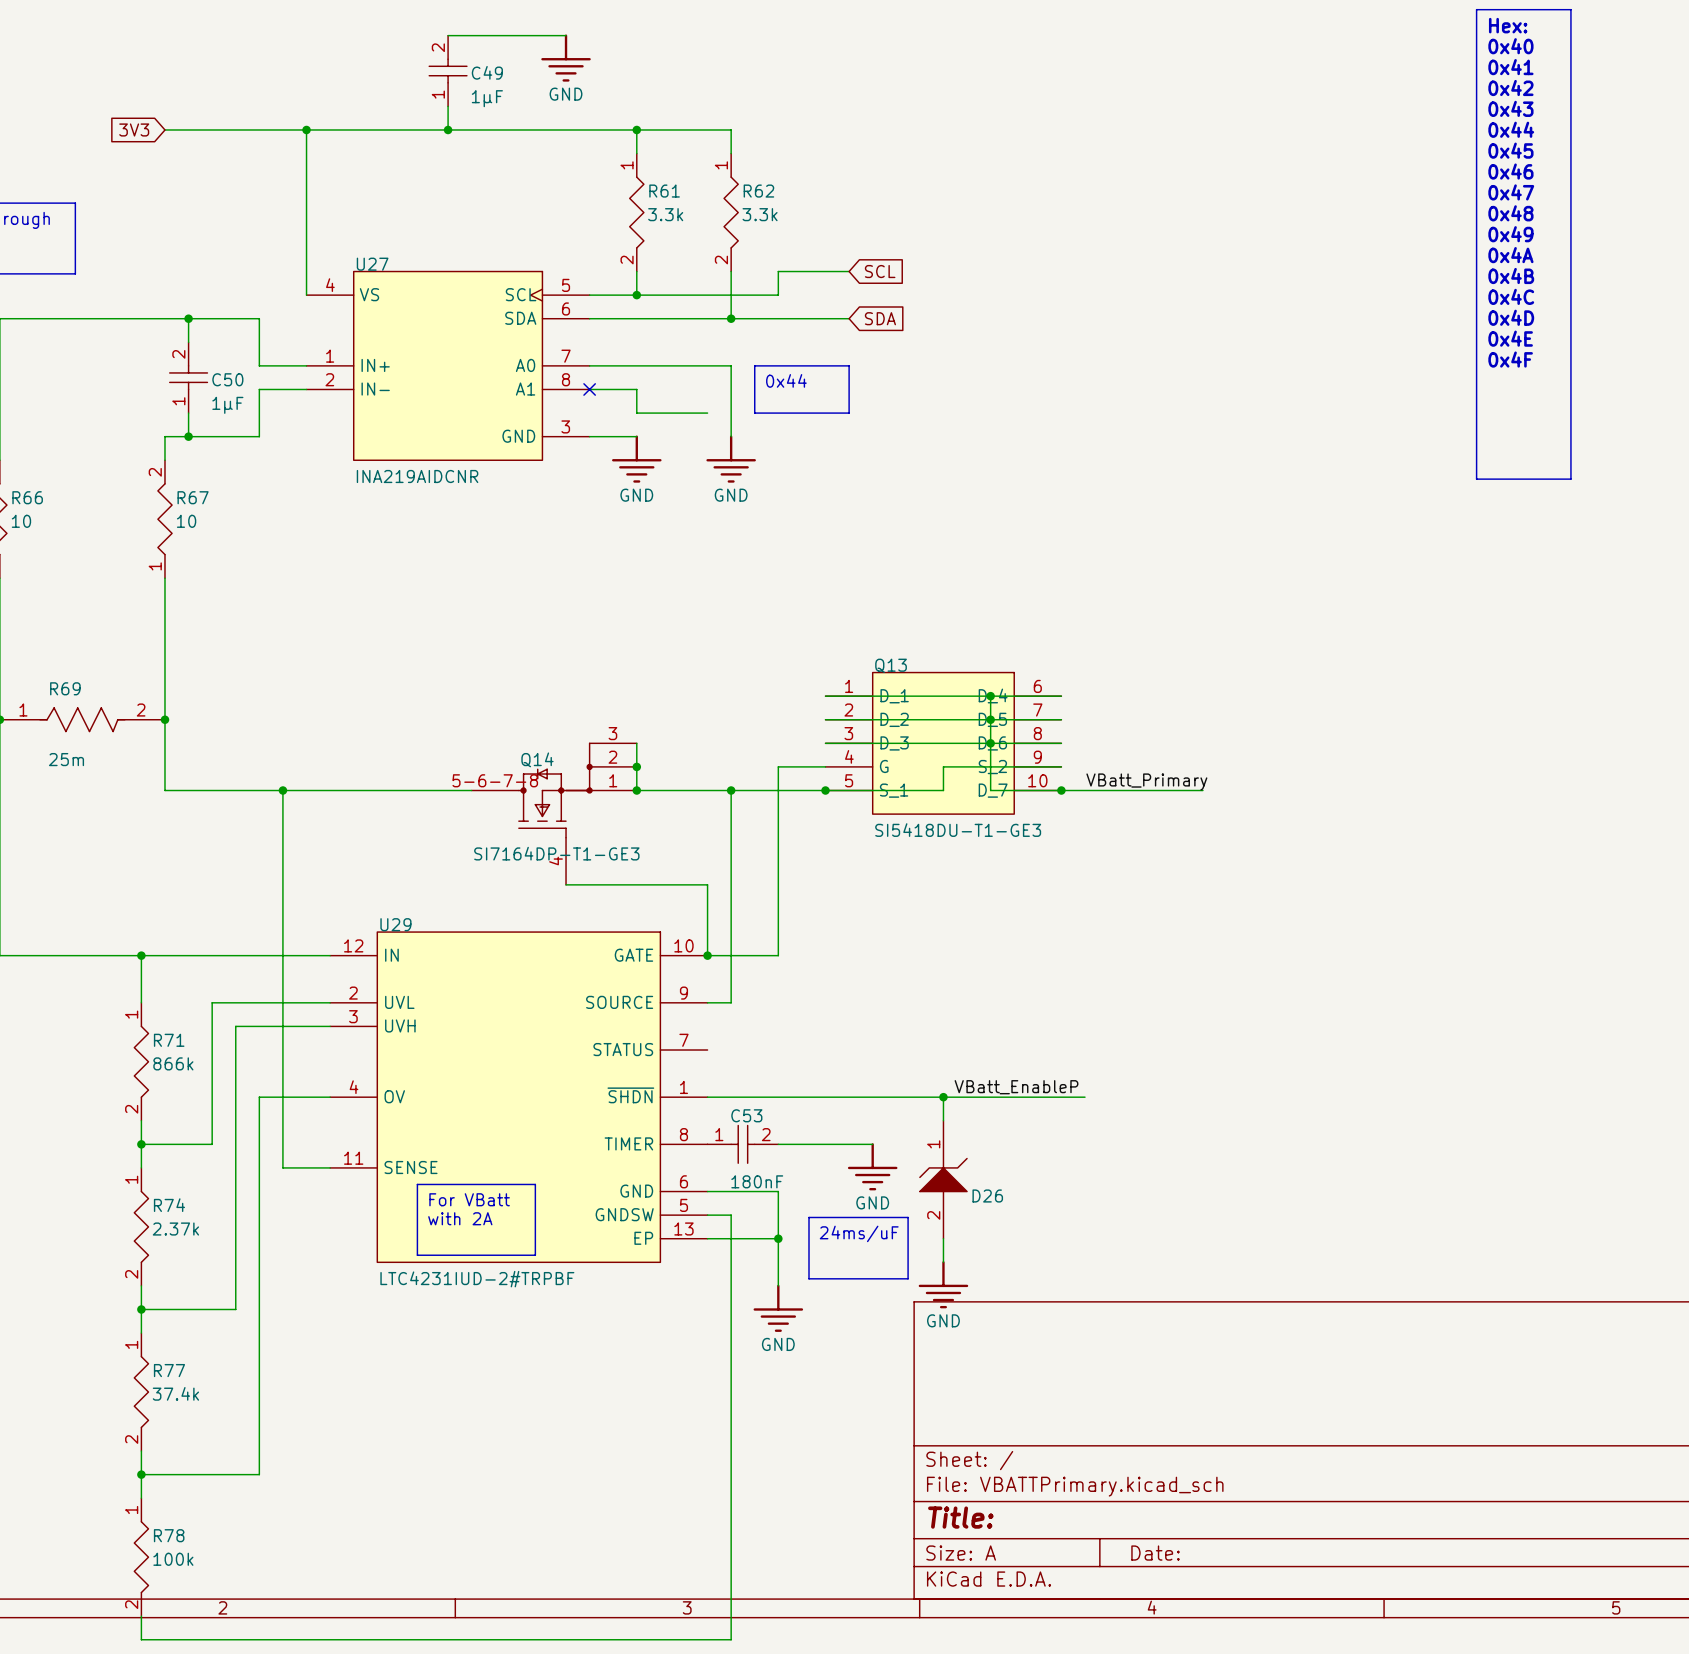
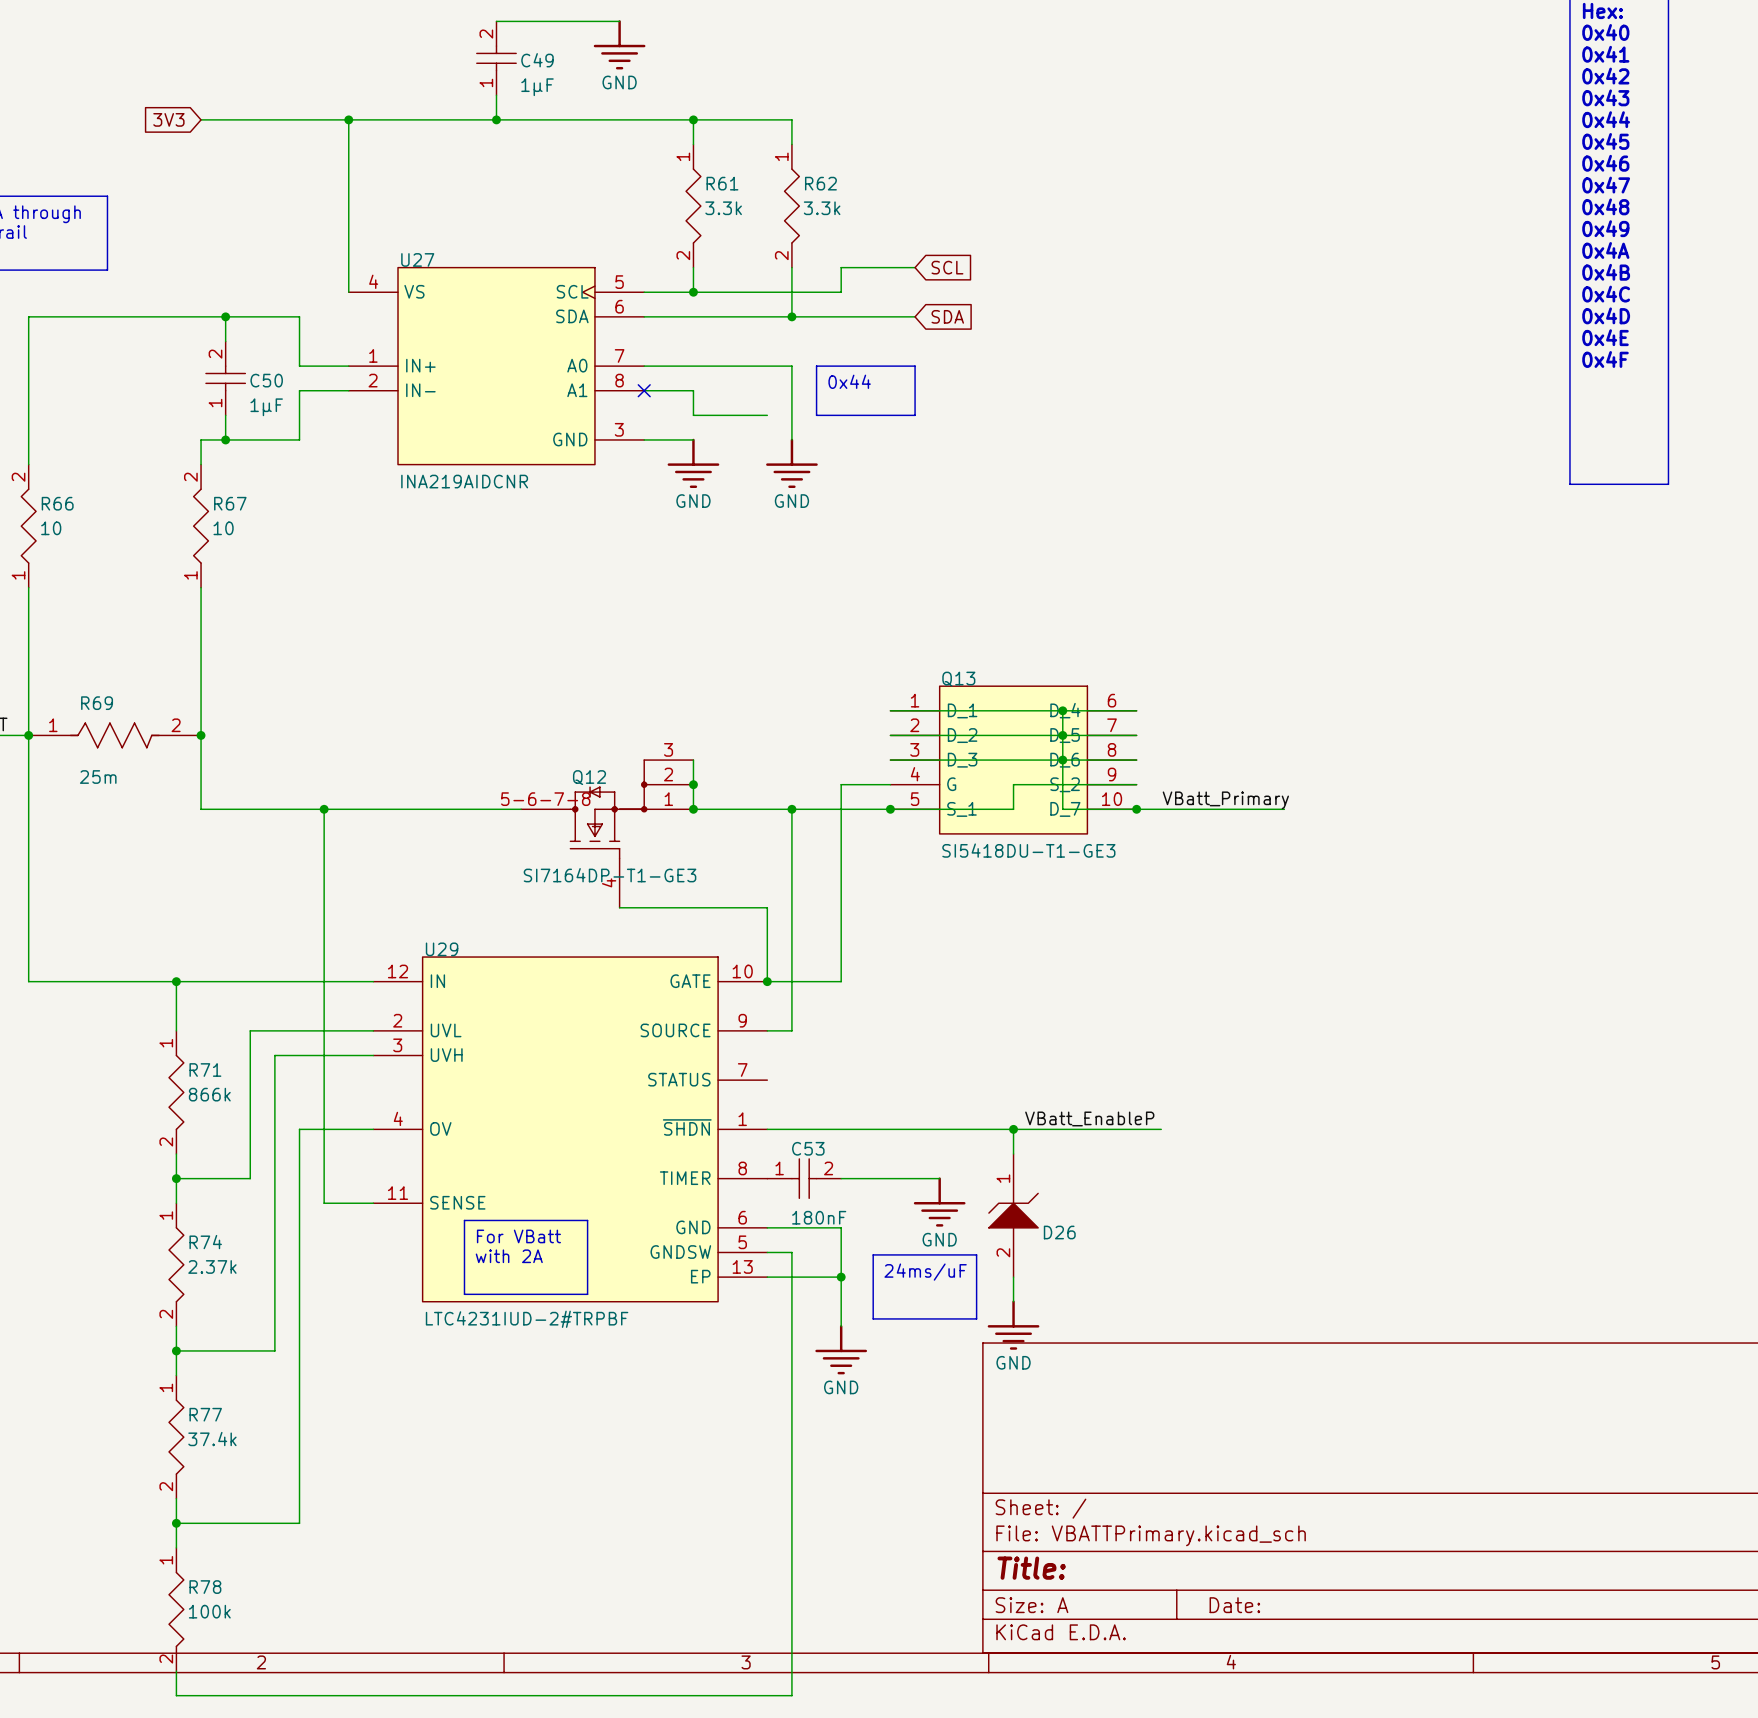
Q14 name: Q14 (537, 759) -> Q12 (589, 777)

